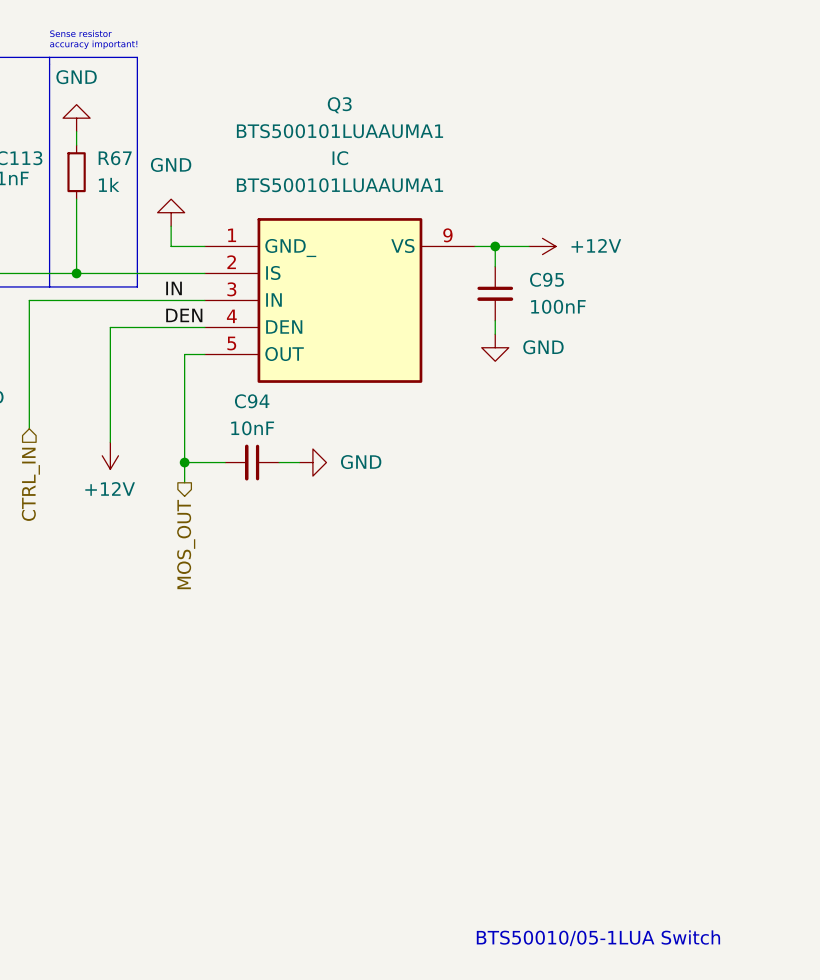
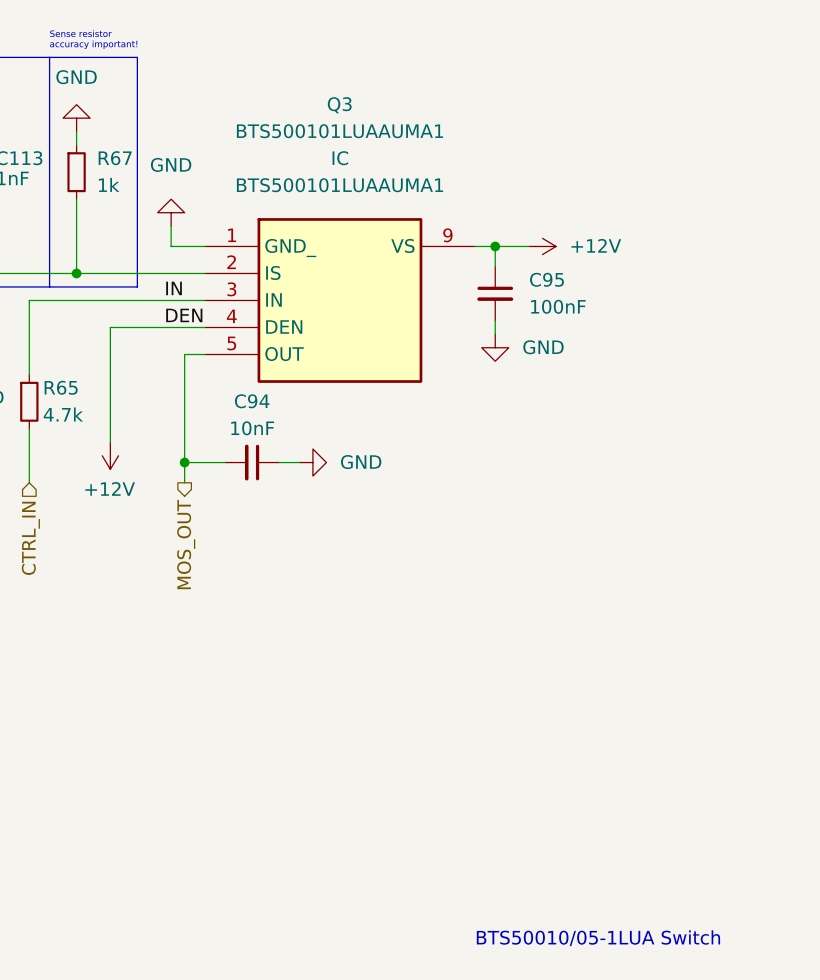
wire: (29, 374) (29, 428) -> (29, 482) (29, 428)
R65: none -> 4.7k (29, 401)
hierarchical label position: CTRL_IN (30, 484) -> CTRL_IN (30, 538)

